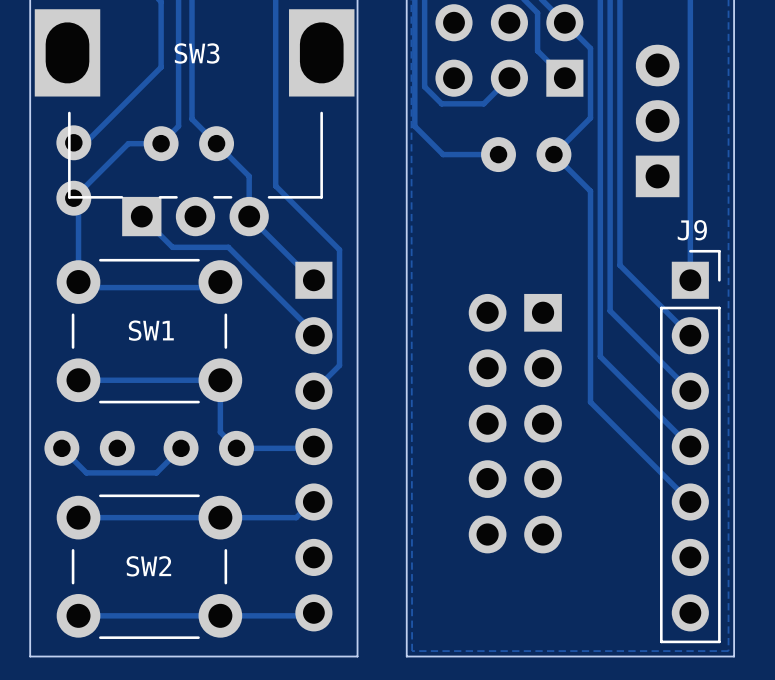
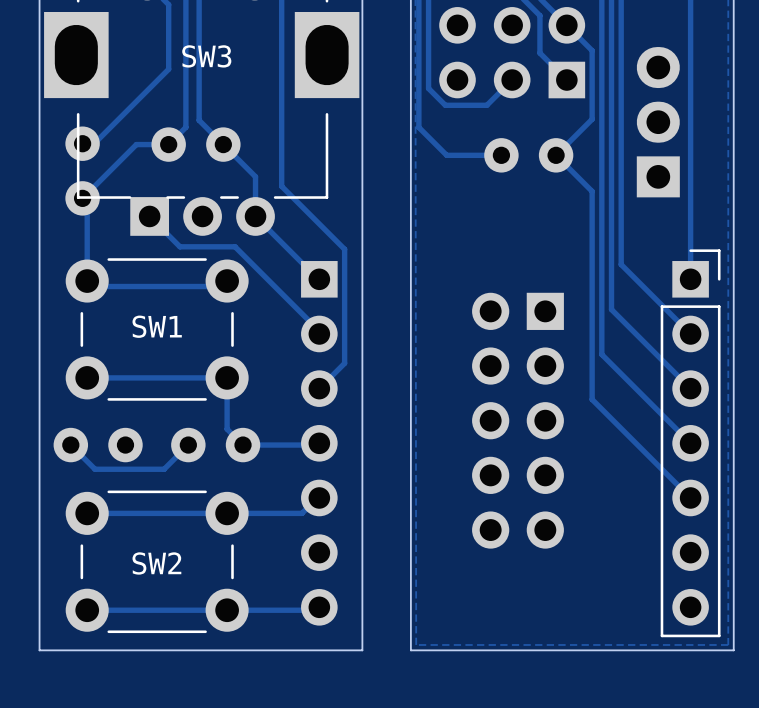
text: SW3 (197, 53) -> none
SW3 name: none -> SW3 (206, 56)
text: J9 (692, 230) -> none
SW1 name: none -> SW1 (157, 326)
text: SW1 (151, 330) -> none
text: SW2 (148, 566) -> none
SW2 name: none -> SW2 (156, 563)

